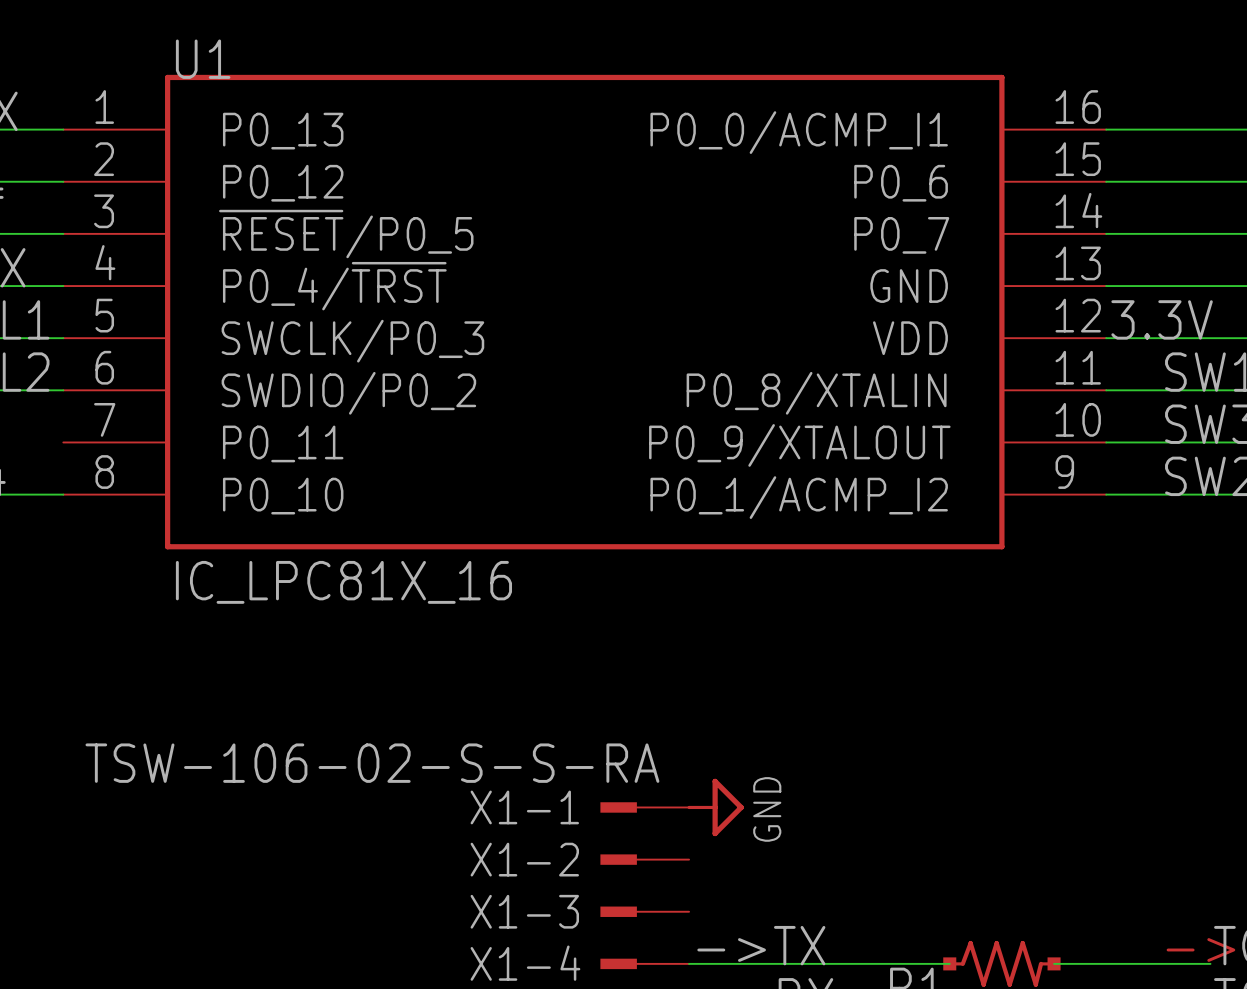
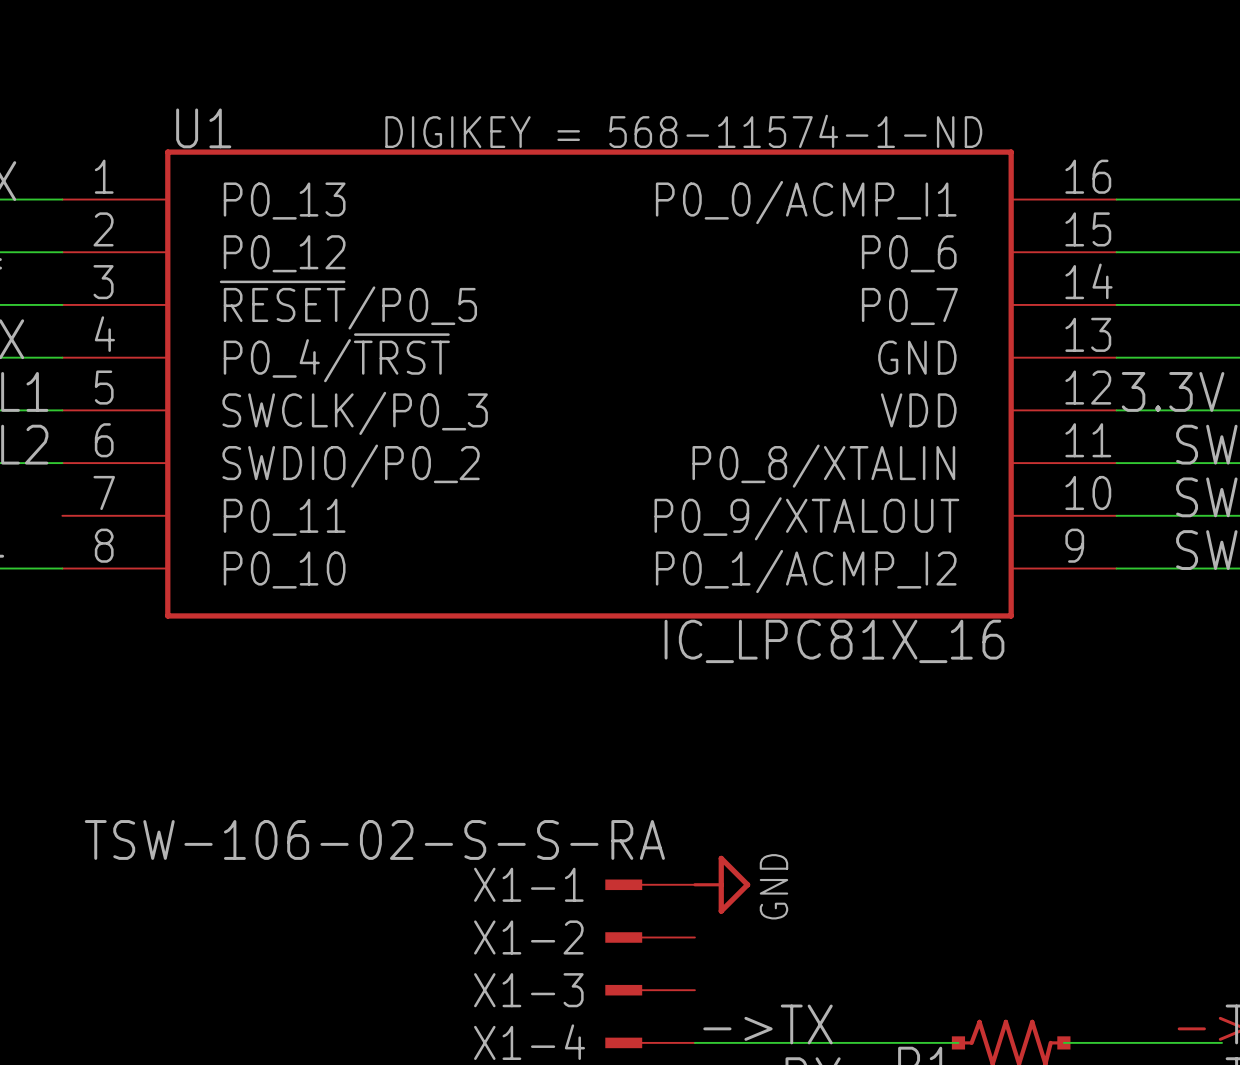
U1 text: none -> DIGIKEY = 568-11574-1-ND (683, 131)
U1 symbol: [63, 74, 1107, 550] -> [62, 149, 1117, 619]
U1 value position: IC_LPC81X_16 (343, 582) -> IC_LPC81X_16 (834, 641)

